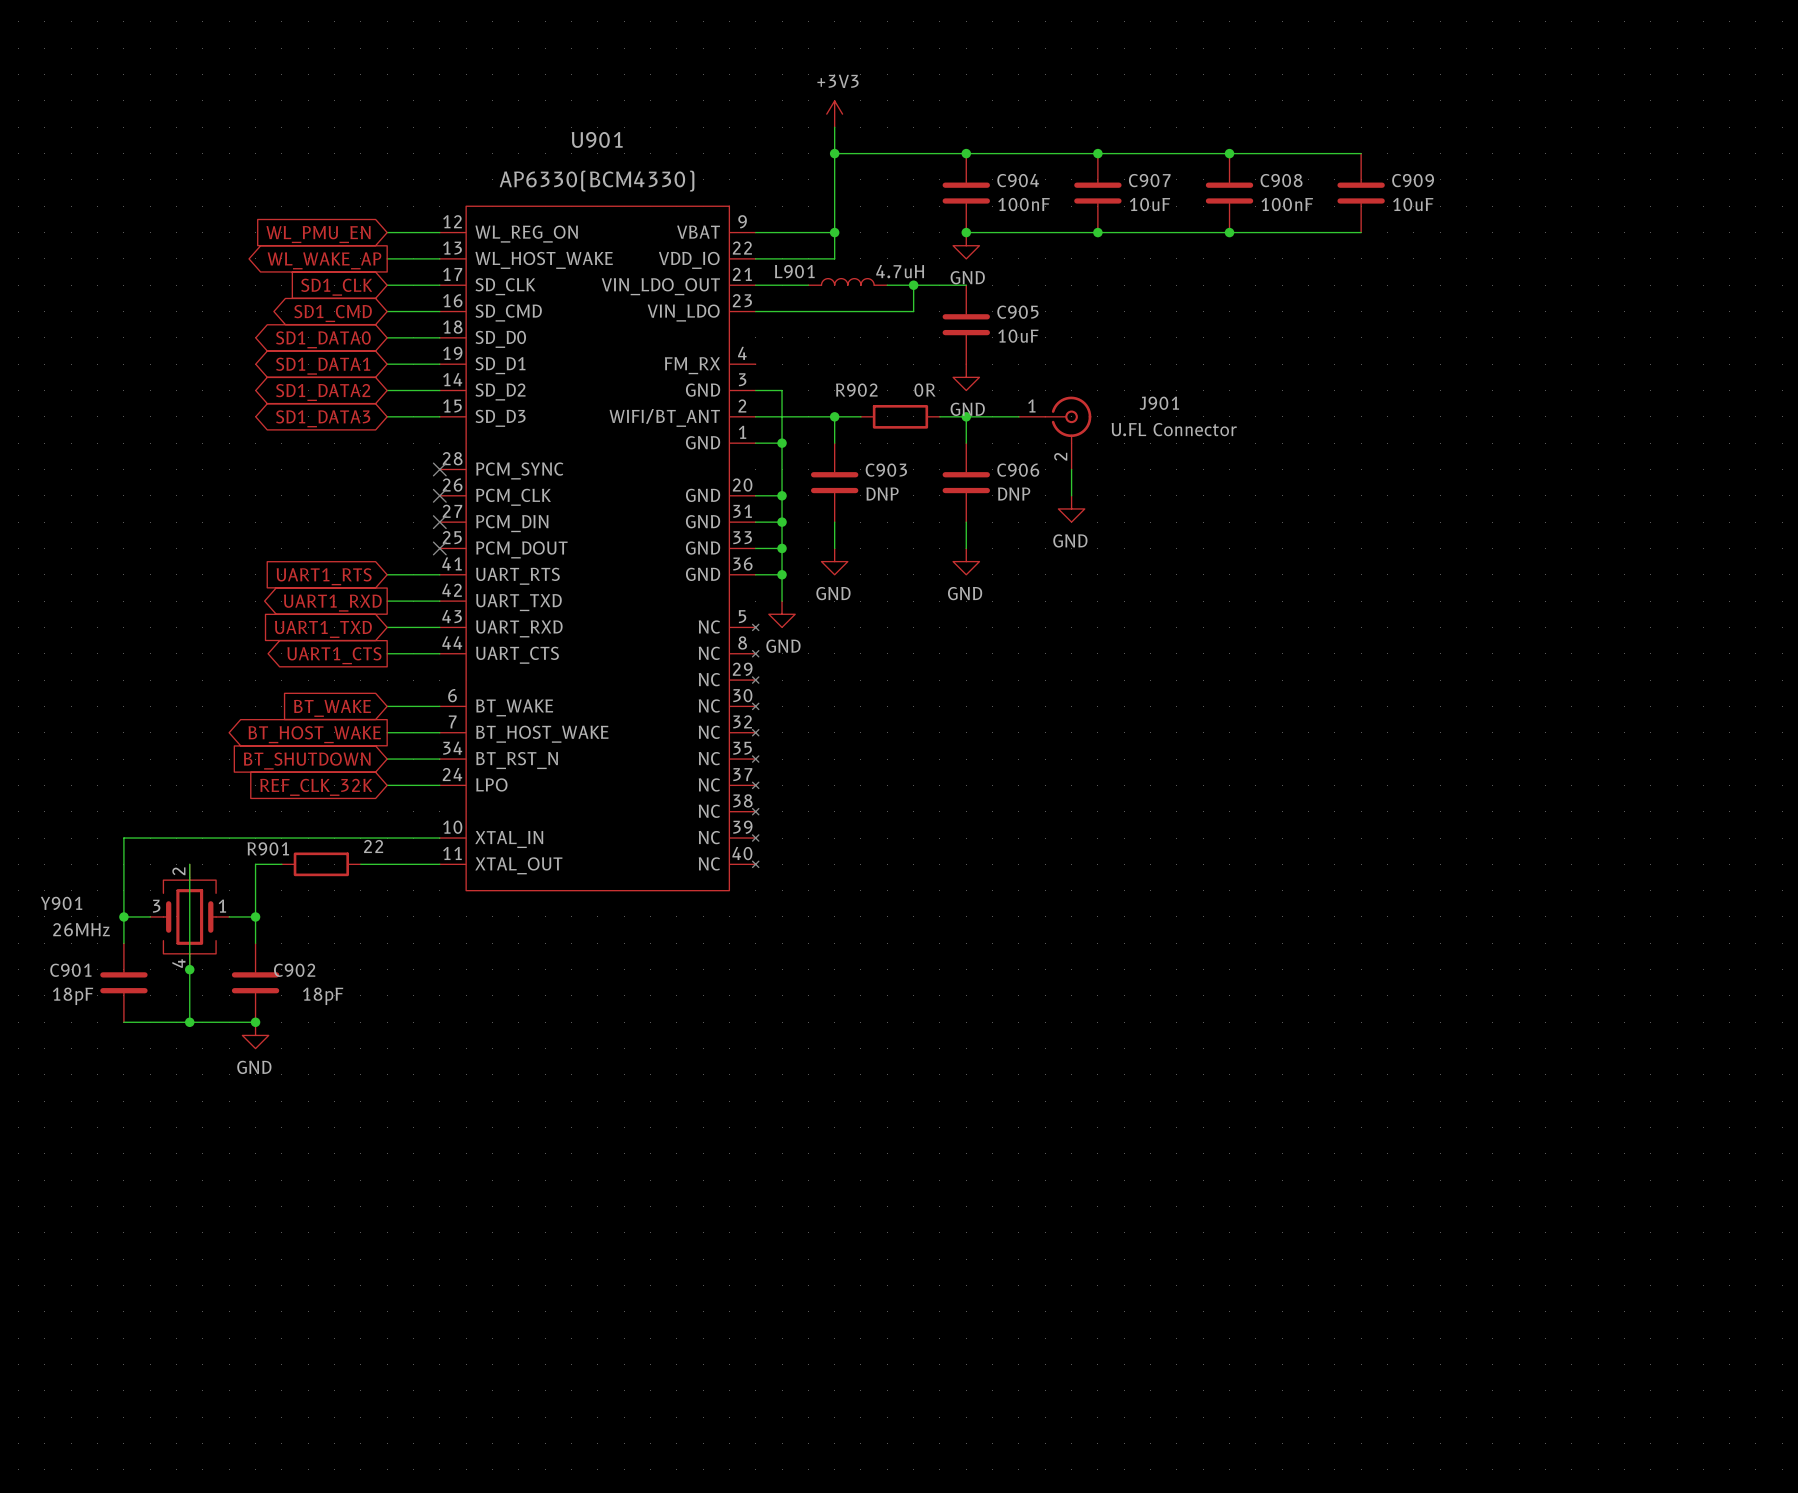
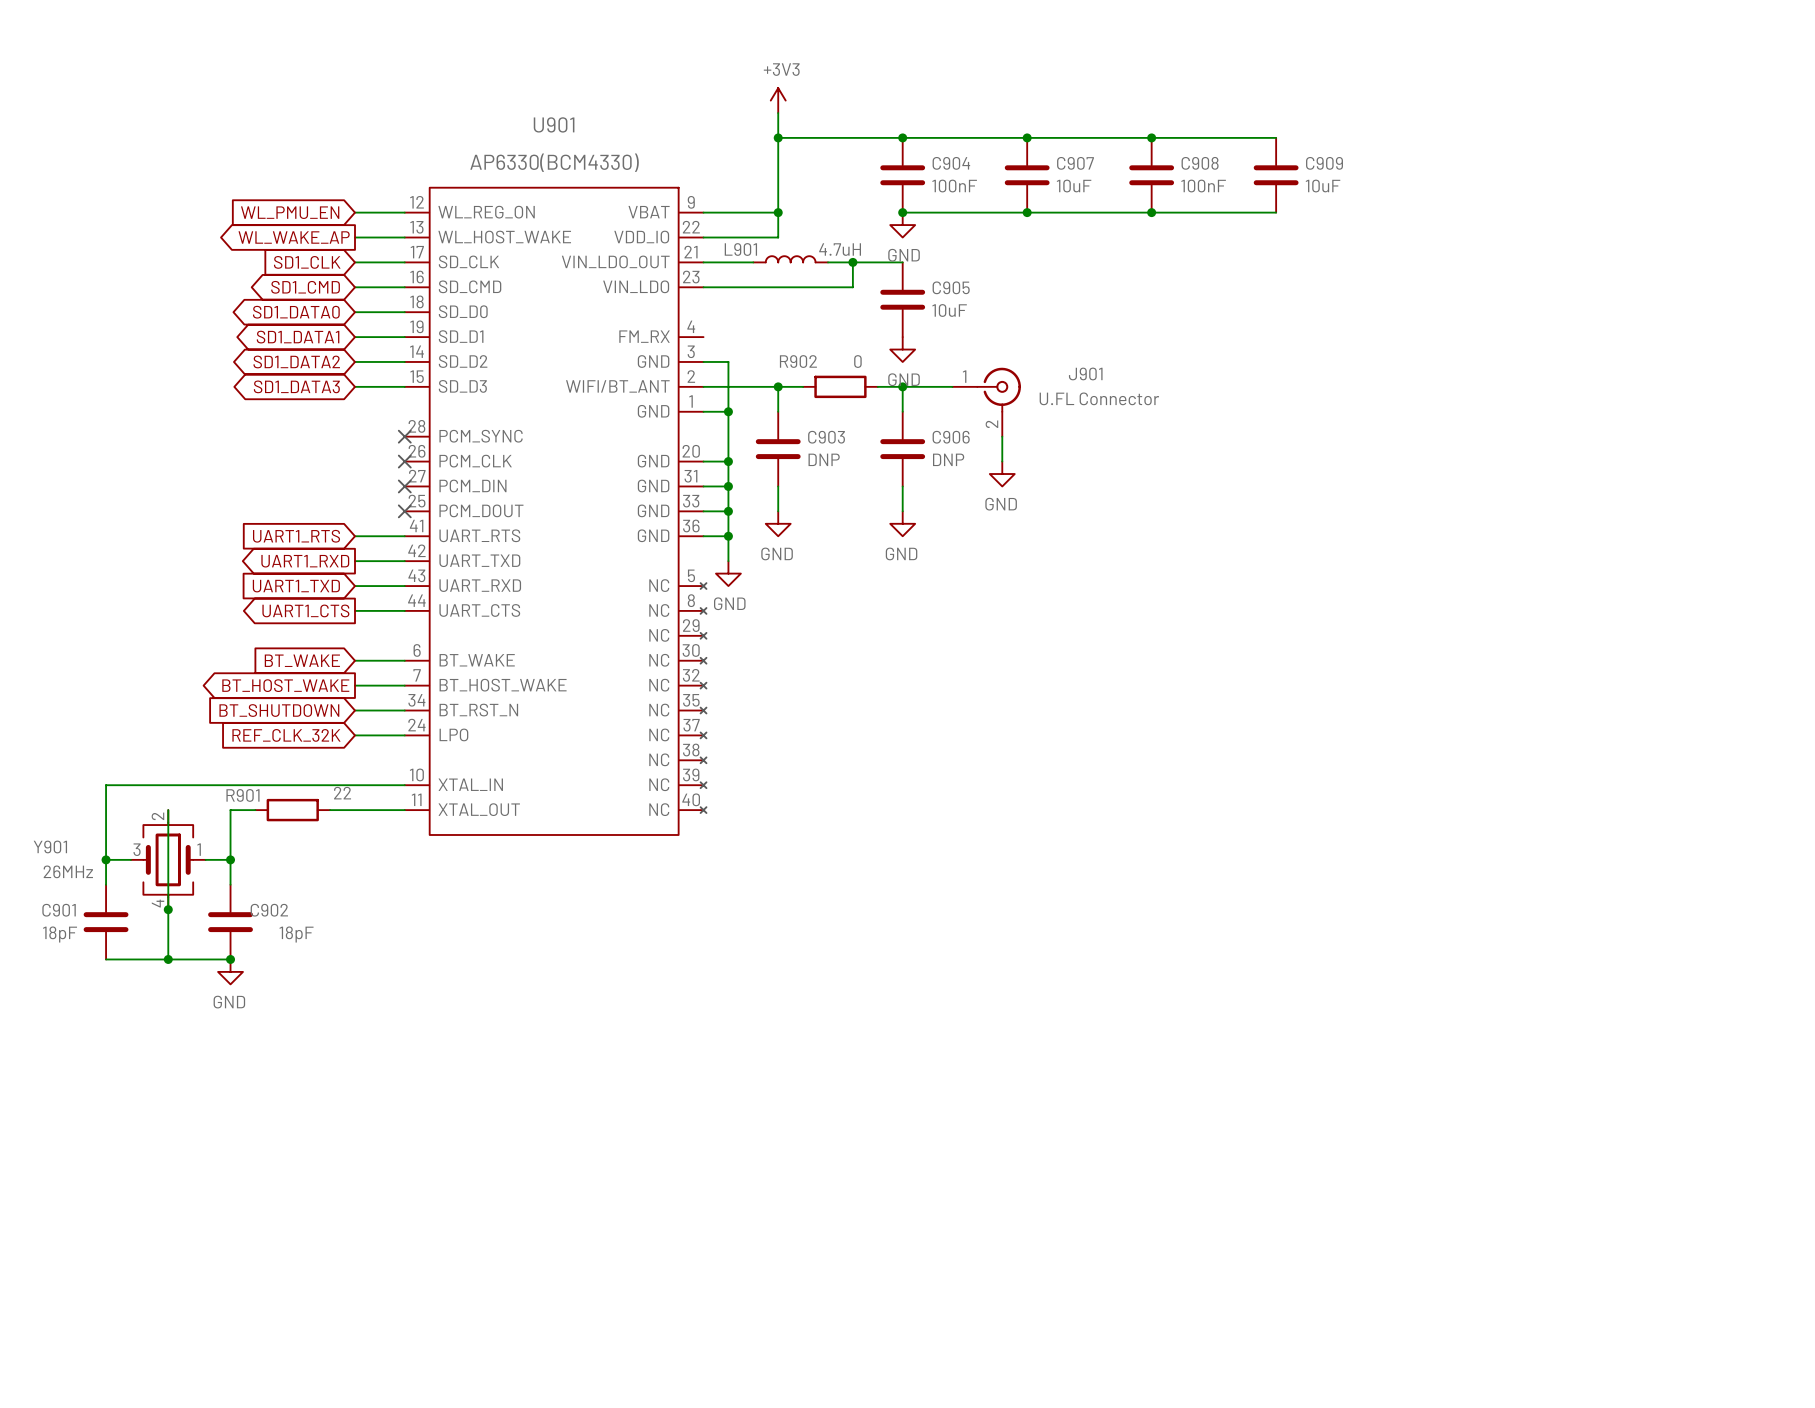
R902 value: 0R (924, 390) -> 0 (857, 361)

